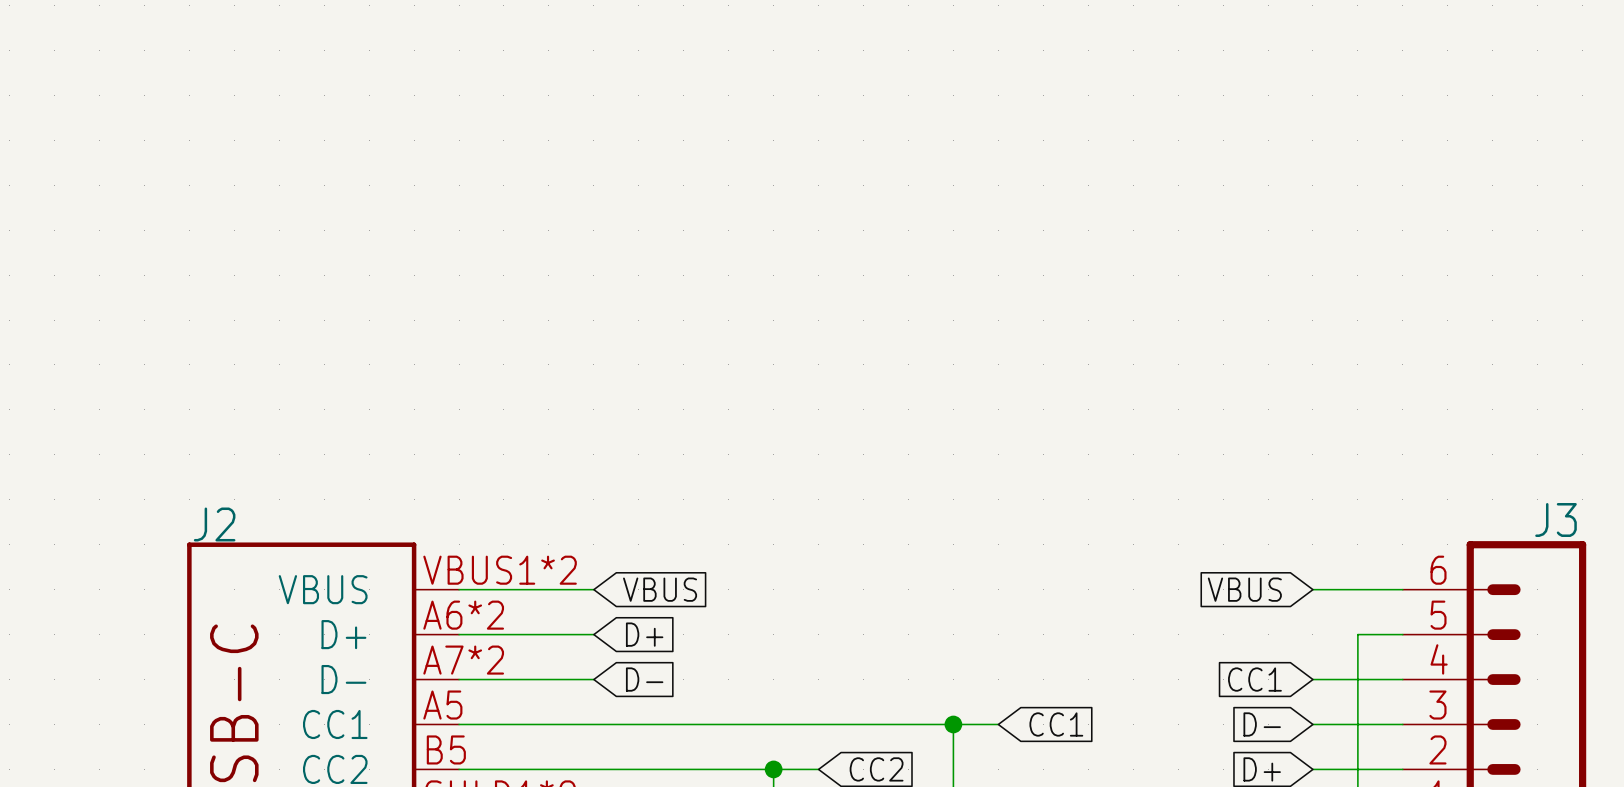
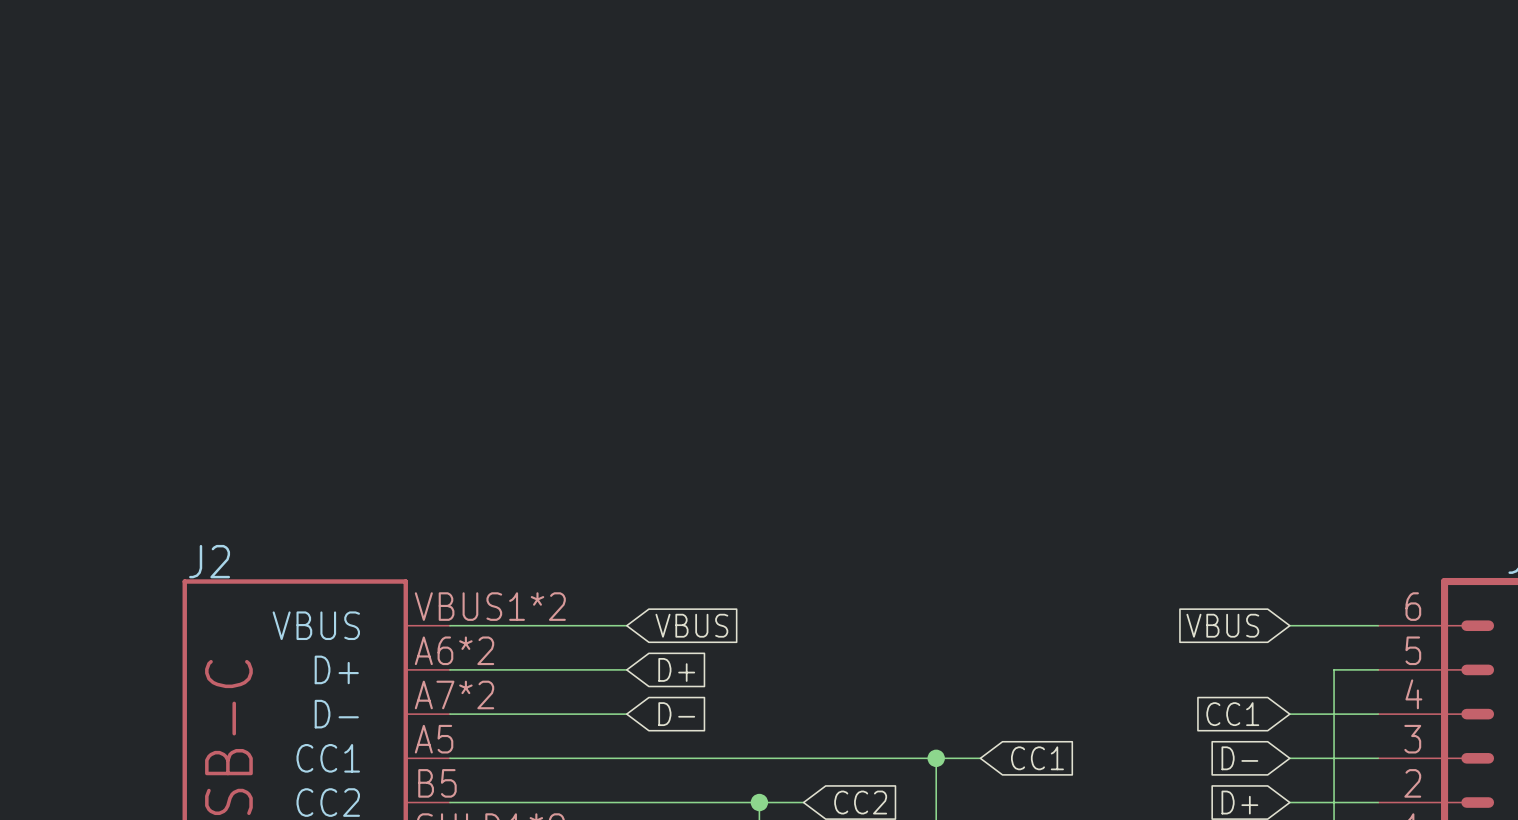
wire: none -> (582, 625) (626, 625)
global label position: VBUS (660, 589) -> VBUS (691, 625)
wire: none -> (582, 669) (626, 669)
global label position: D+ (644, 634) -> D+ (676, 669)
wire: none -> (582, 714) (626, 714)
global label position: D- (644, 679) -> D- (676, 714)

